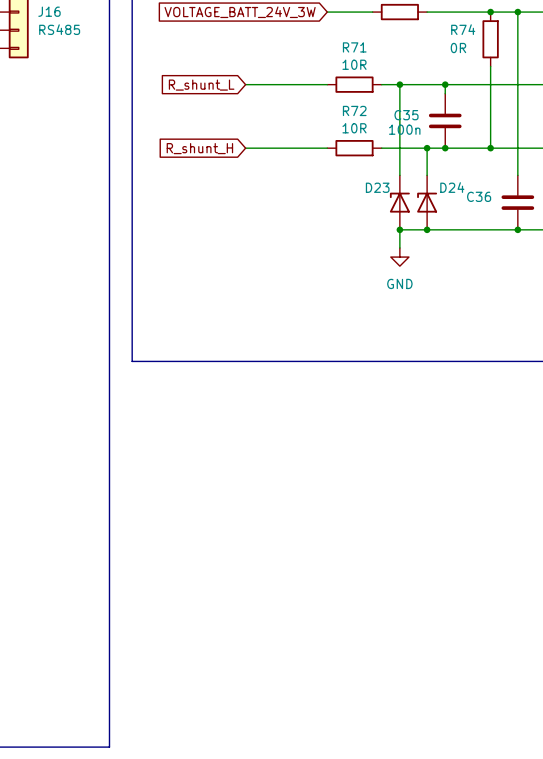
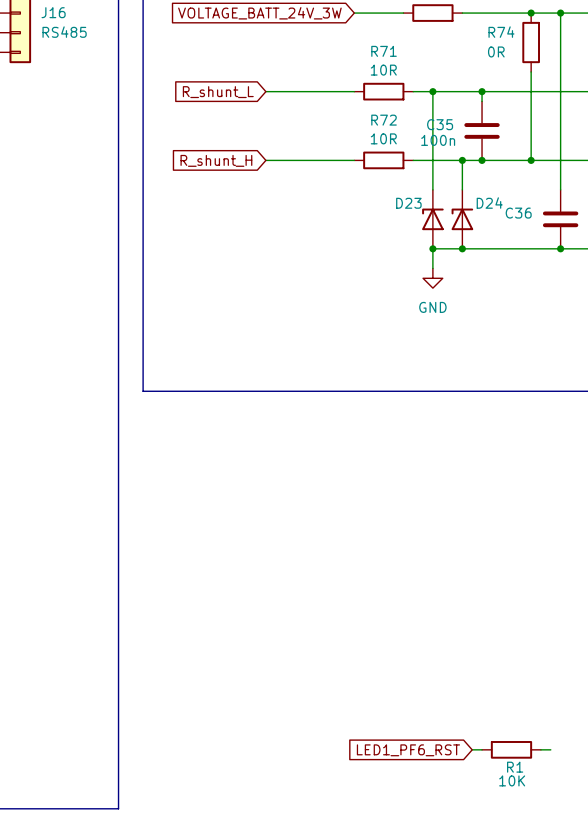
wire: none -> (472, 749) (482, 749)
R1: none -> 10K (511, 749)
wire: none -> (540, 749) (550, 749)
global label: none -> LED1_PF6_RST (408, 750)

